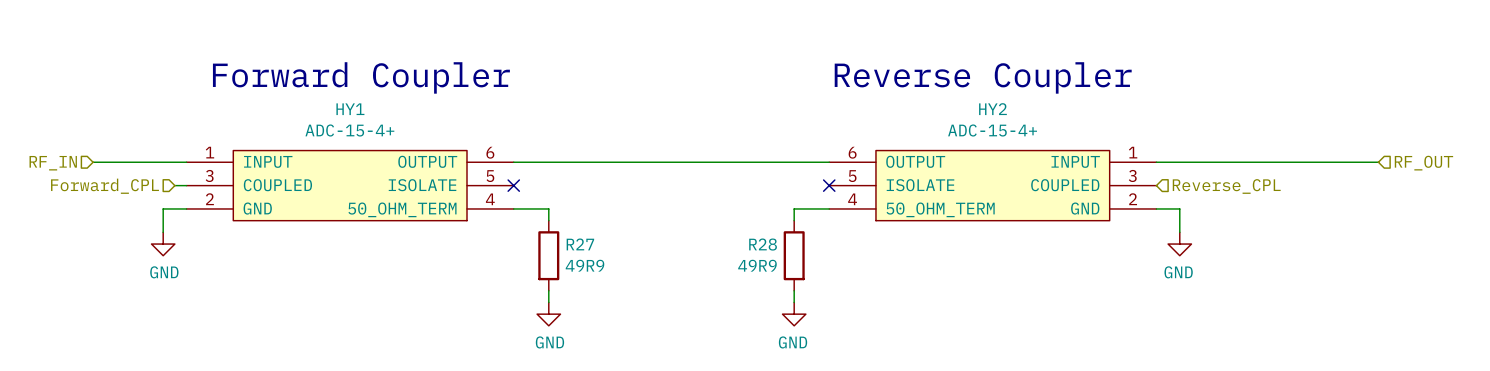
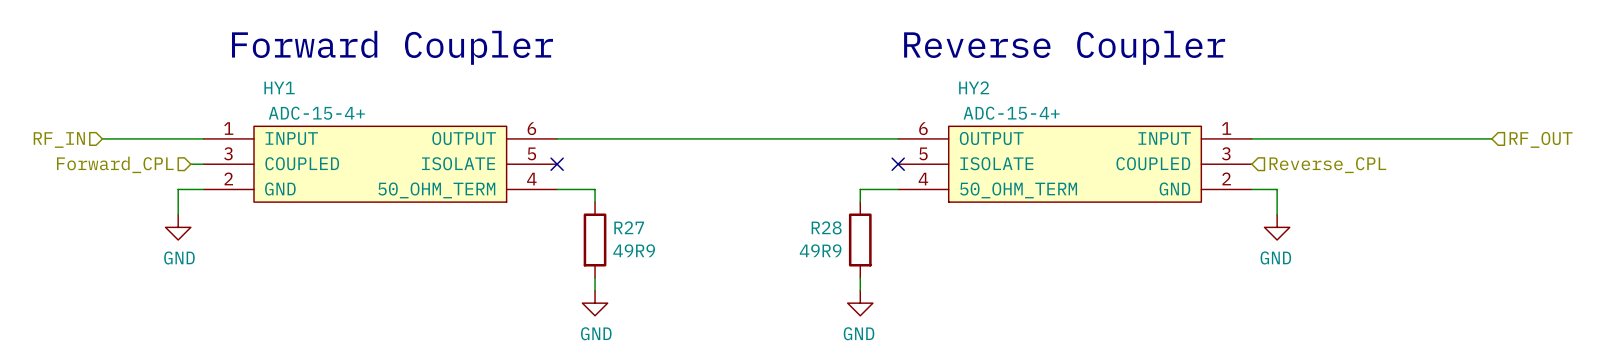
HY1 name position: HY1 (350, 109) -> HY1 (279, 87)
HY2 name position: HY2 (992, 109) -> HY2 (974, 87)
HY1 value position: ADC-15-4+ (349, 130) -> ADC-15-4+ (316, 113)
HY2 value position: ADC-15-4+ (992, 130) -> ADC-15-4+ (1011, 113)

